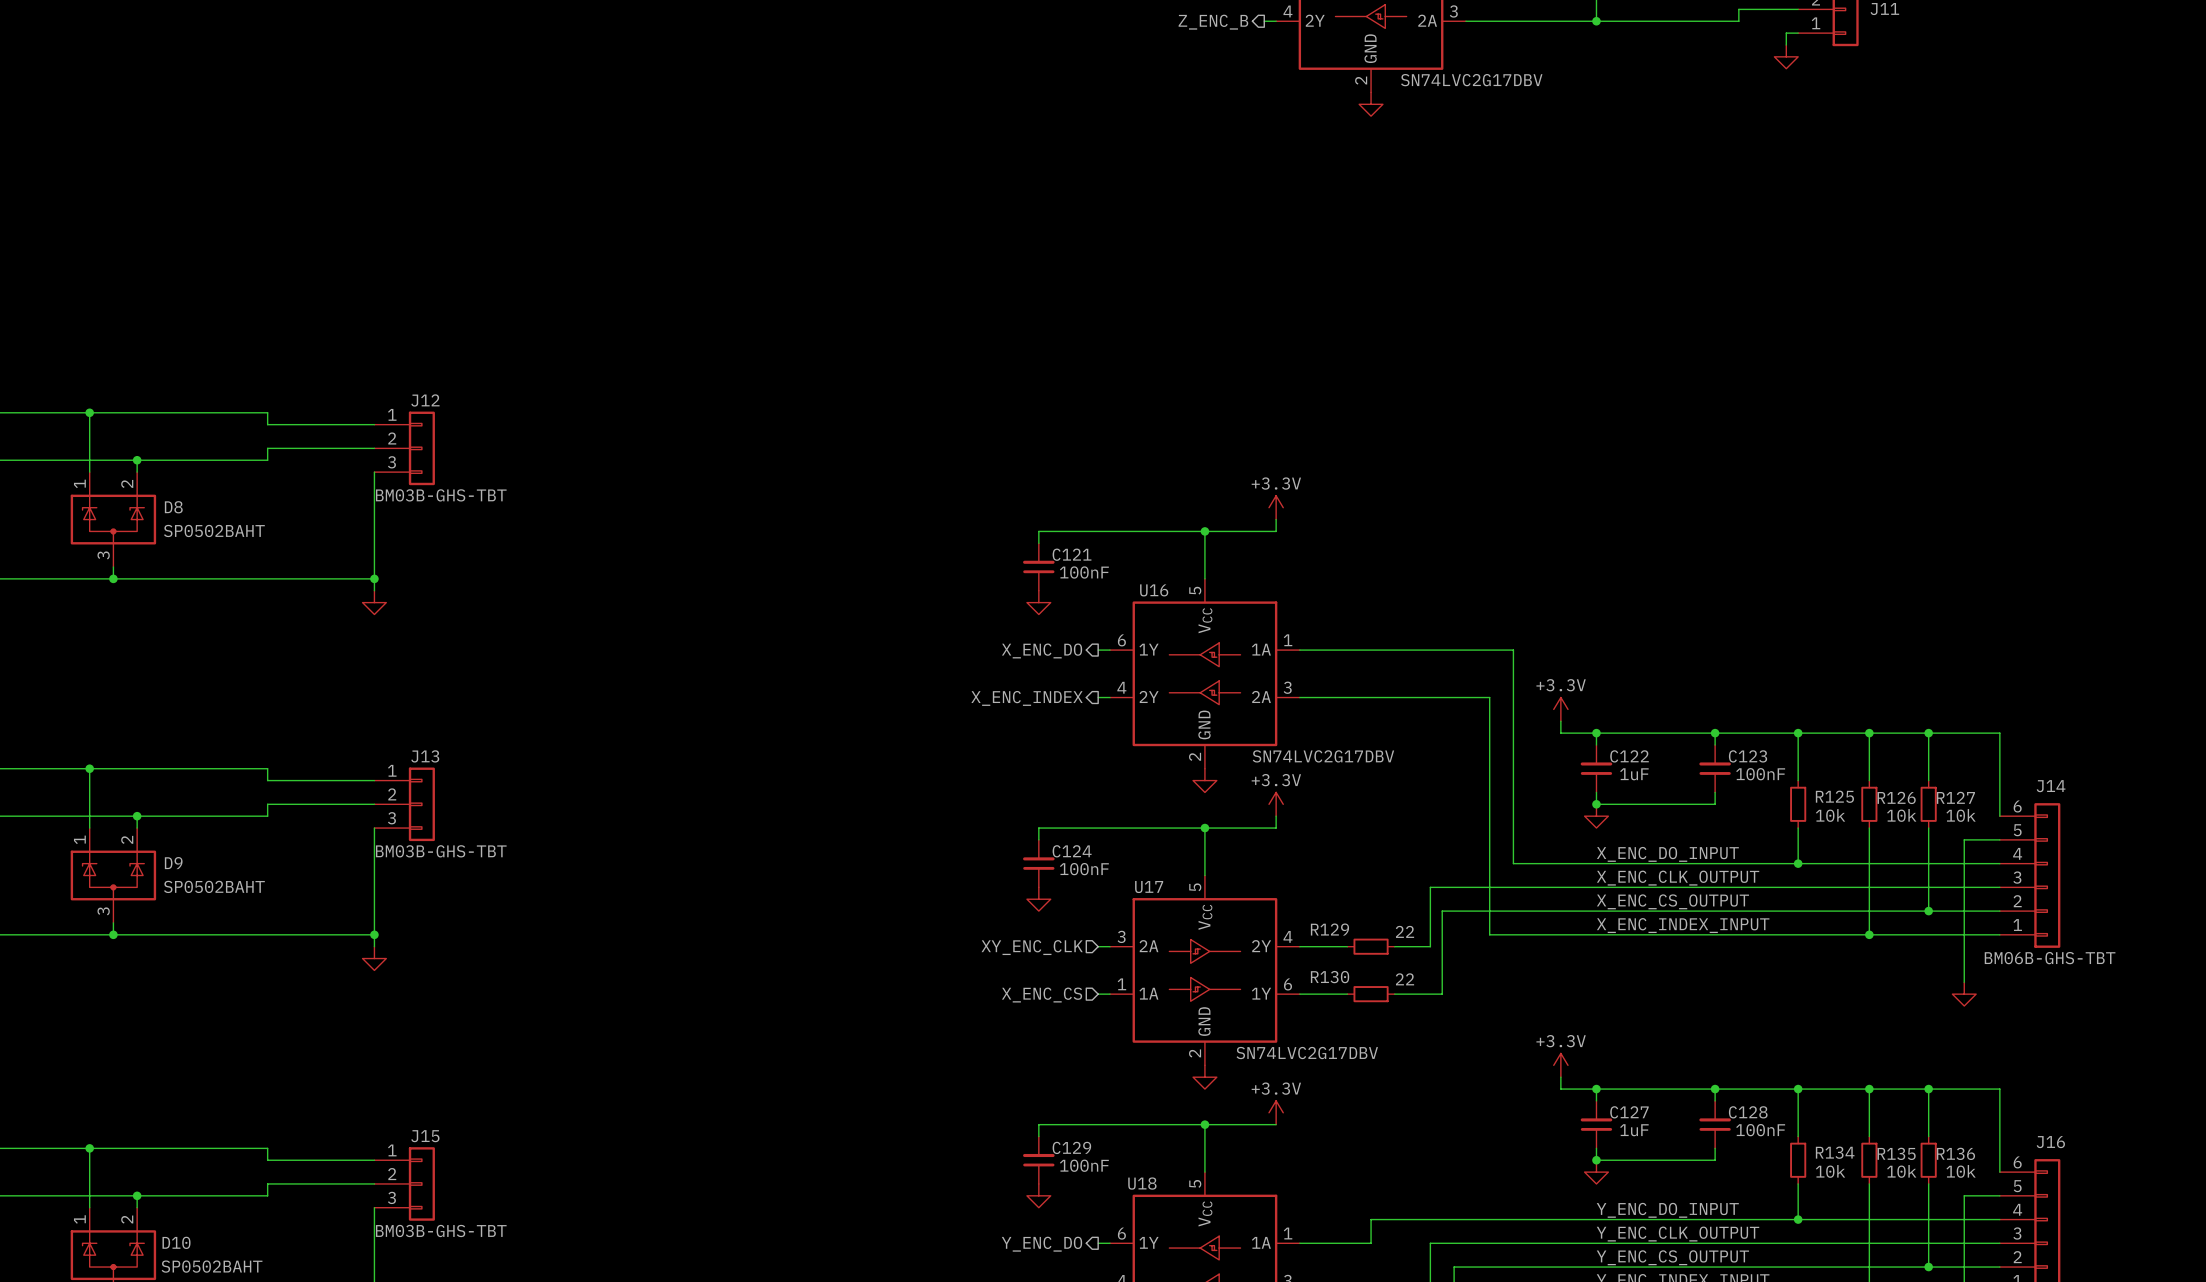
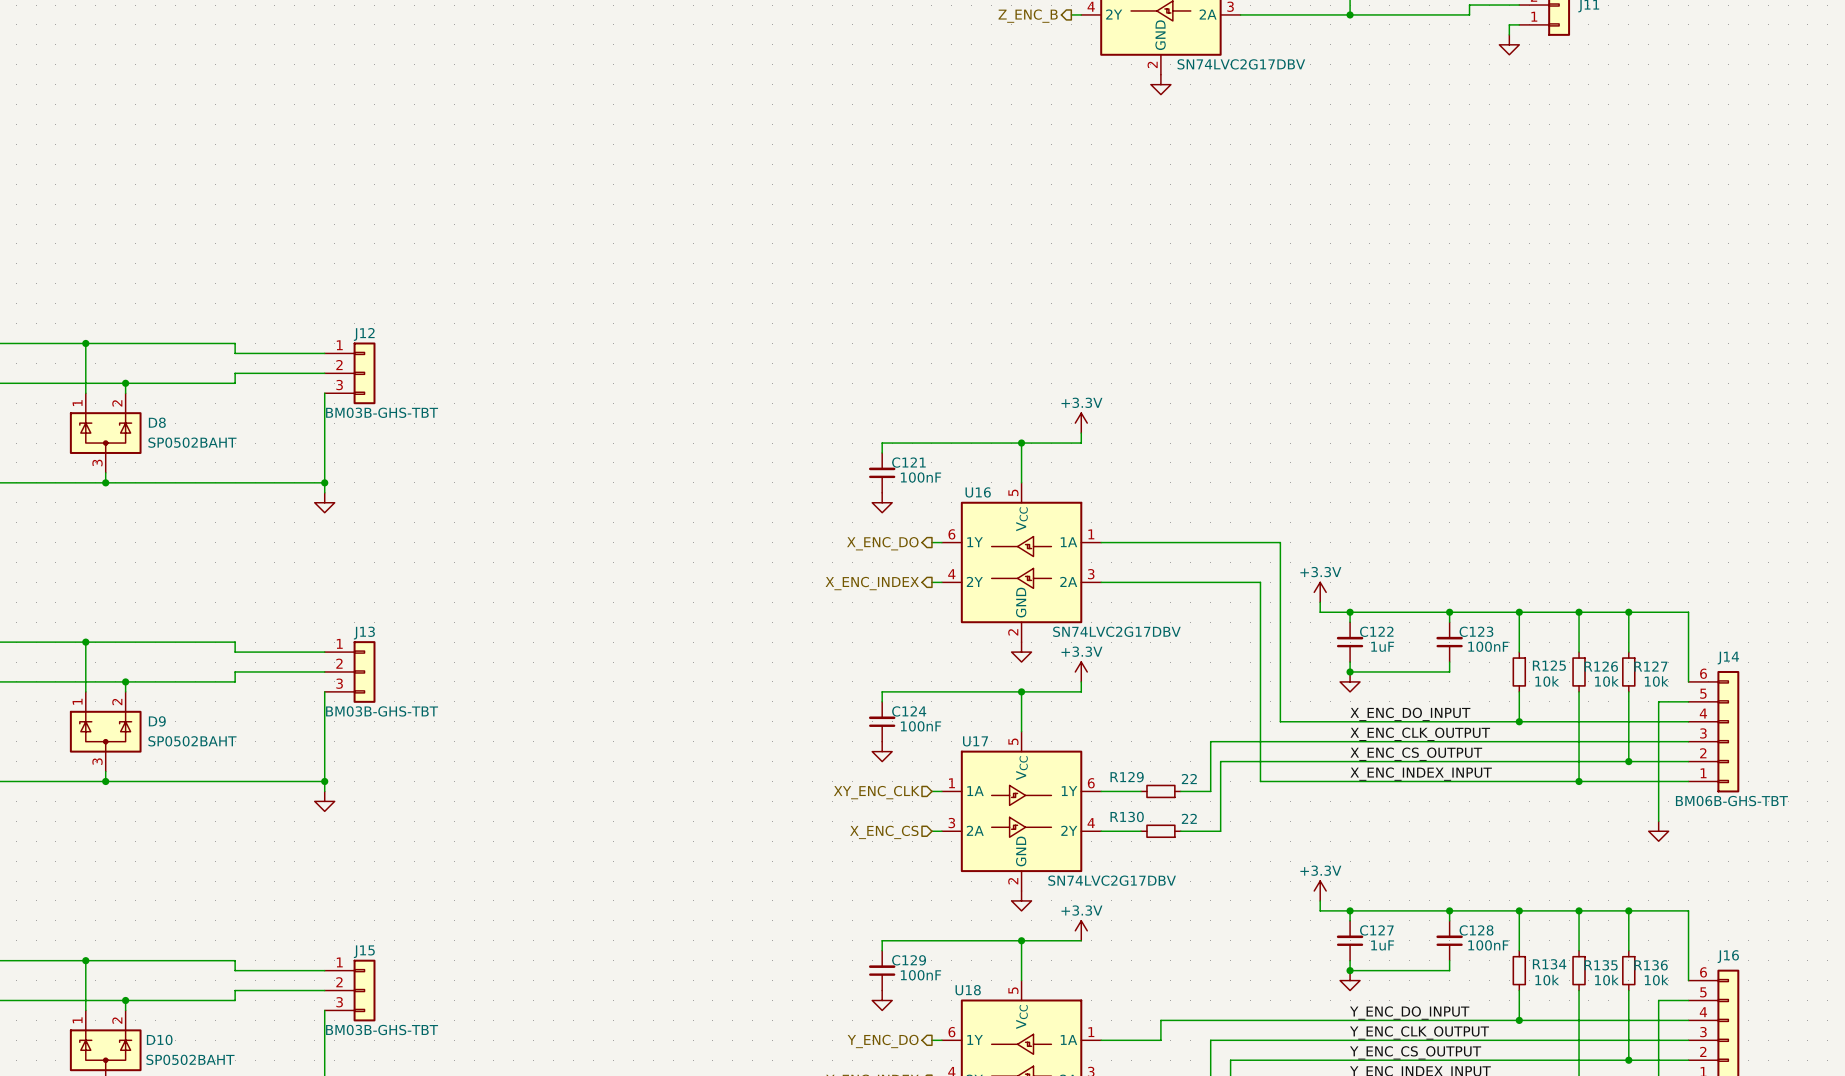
U17 pin number: 3 (1121, 936) -> 1 (951, 783)
U17 pin number: 4 (1287, 936) -> 6 (1091, 783)
U17 pin name: 2A (1149, 946) -> 1A (975, 791)
U17 pin name: 2Y (1261, 946) -> 1Y (1069, 791)
U17 pin number: 1 (1121, 984) -> 3 (951, 823)
U17 pin number: 6 (1287, 984) -> 4 (1091, 823)
U17 pin name: 1A (1148, 993) -> 2A (975, 830)
U17 pin name: 1Y (1261, 993) -> 2Y (1069, 830)

